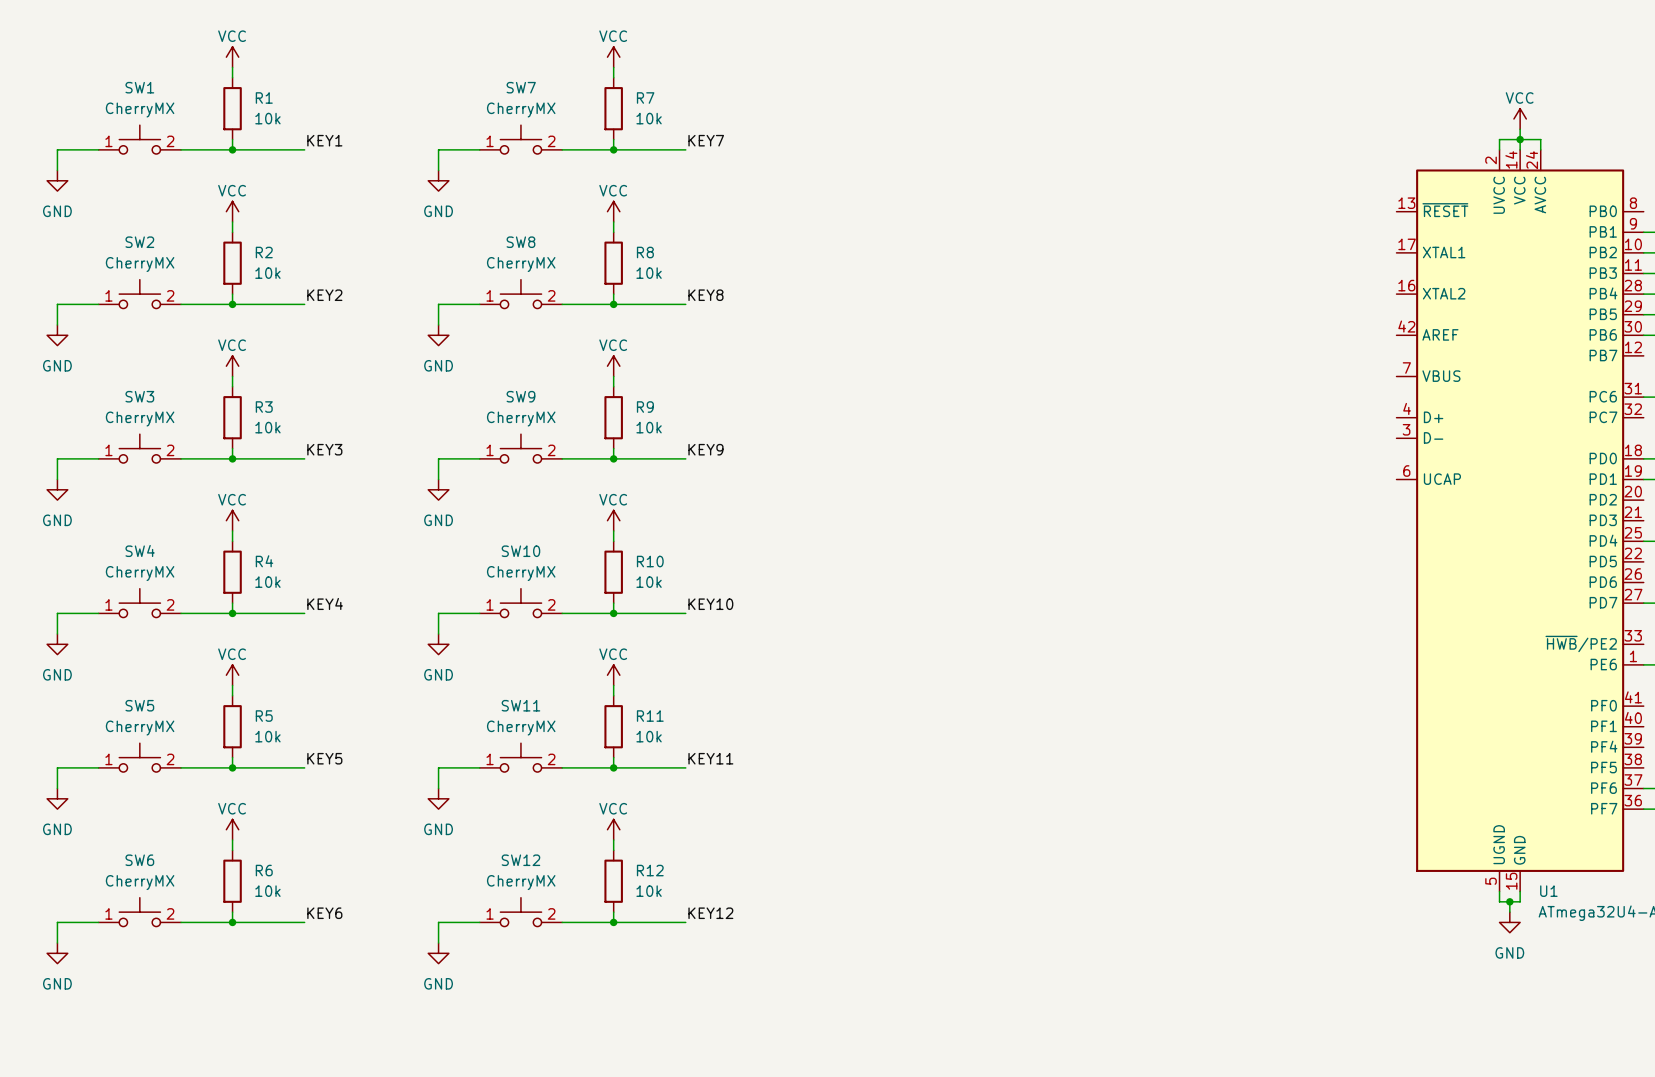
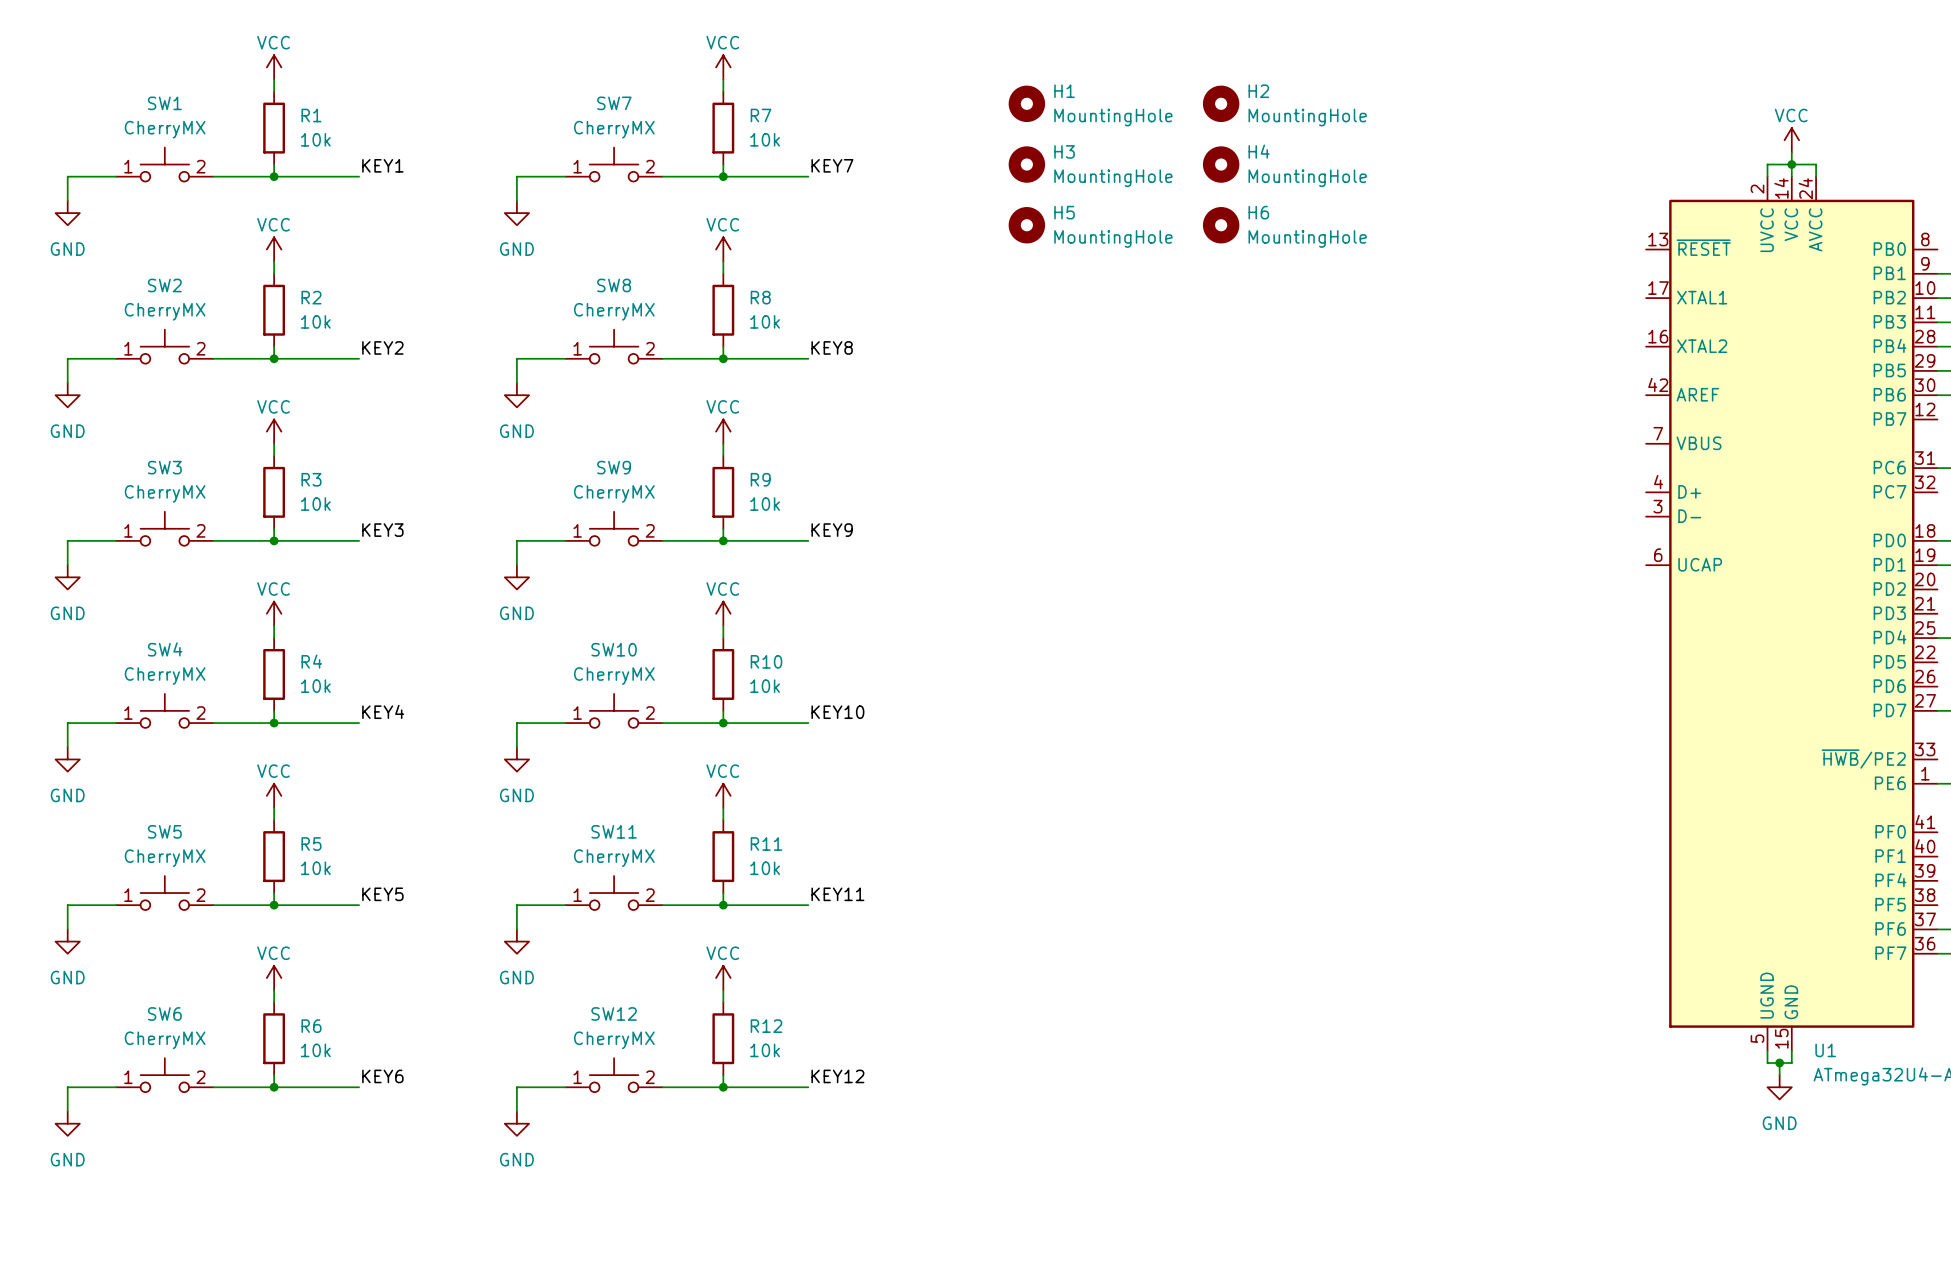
H1: none -> MountingHole (1026, 103)
H2: none -> MountingHole (1221, 103)
H3: none -> MountingHole (1026, 164)
H4: none -> MountingHole (1221, 164)
H5: none -> MountingHole (1026, 225)
H6: none -> MountingHole (1221, 225)

